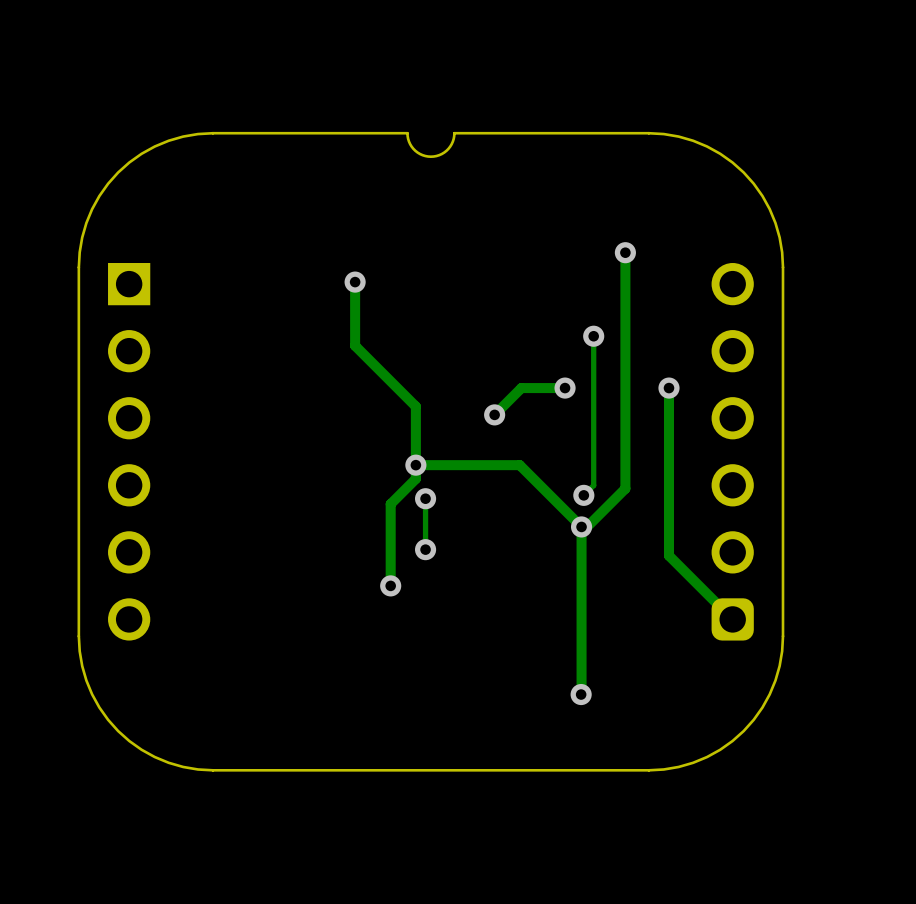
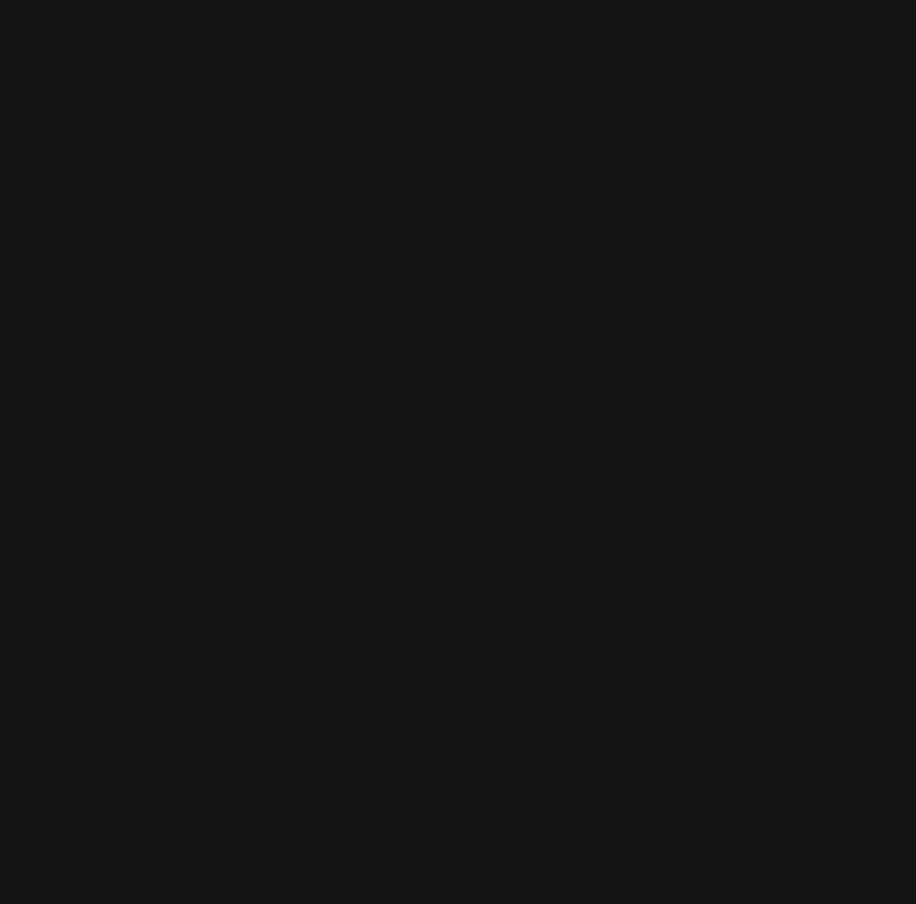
track: (625, 252) (625, 488) (587, 526) (581, 526) -> none
via: (625, 252) -> none
track: (355, 282) (355, 345) (415, 406) (415, 478) (390, 504) (390, 585) -> none
via: (355, 282) -> none
track: (593, 336) (593, 485) (583, 495) -> none
via: (593, 336) -> none
track: (565, 388) (521, 388) (494, 414) -> none
via: (565, 388) -> none
track: (668, 388) (668, 555) (732, 619) -> none
via: (668, 388) -> none
via: (494, 414) -> none
part: (430, 451) -> none
track: (415, 465) (519, 465) (581, 526) -> none
via: (415, 465) -> none
via: (583, 495) -> none
track: (425, 498) (425, 549) -> none
via: (425, 498) -> none
track: (581, 526) (581, 694) -> none
via: (581, 526) -> none
via: (425, 549) -> none
via: (390, 585) -> none
via: (581, 694) -> none

